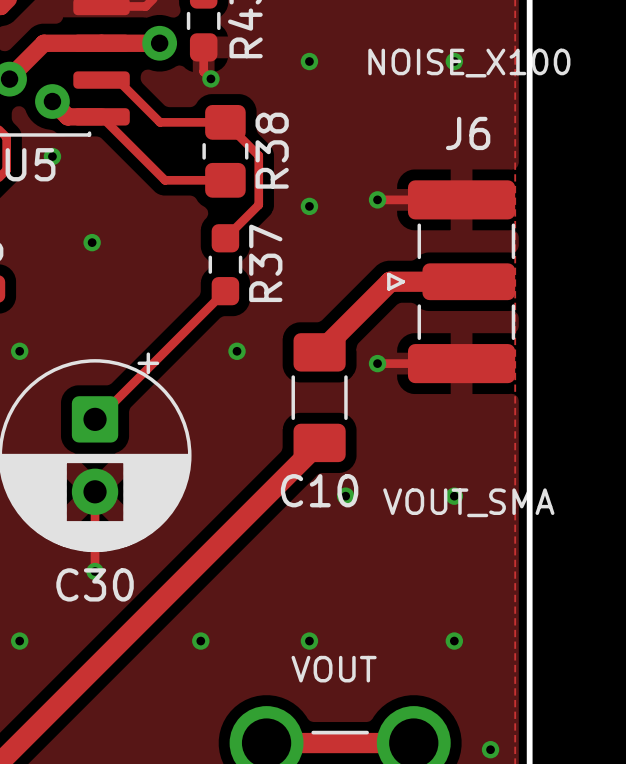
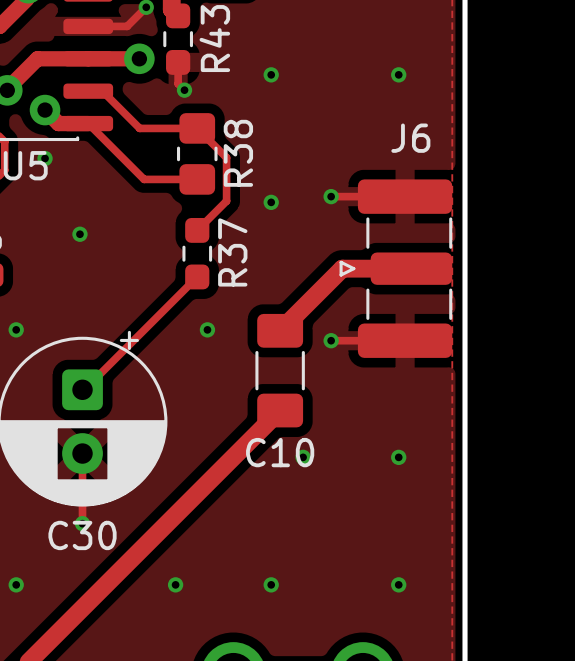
part value: NOISE_X100 (469, 63) -> none
J6 value: VOUT_SMA (468, 502) -> none
part value: VOUT (334, 669) -> none

